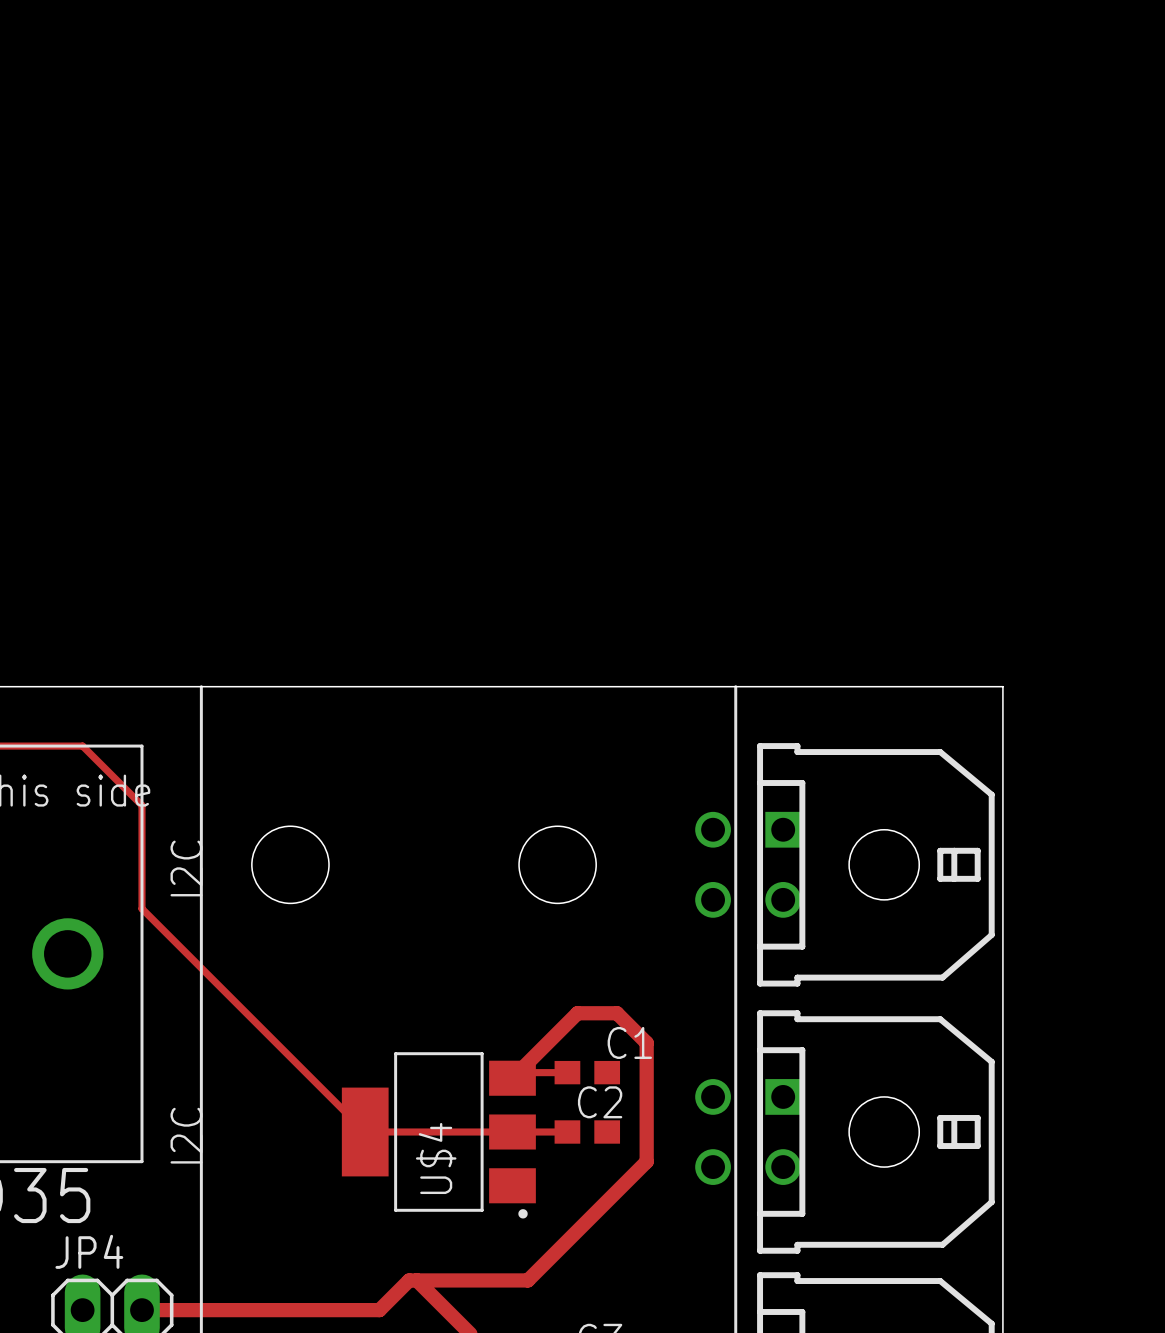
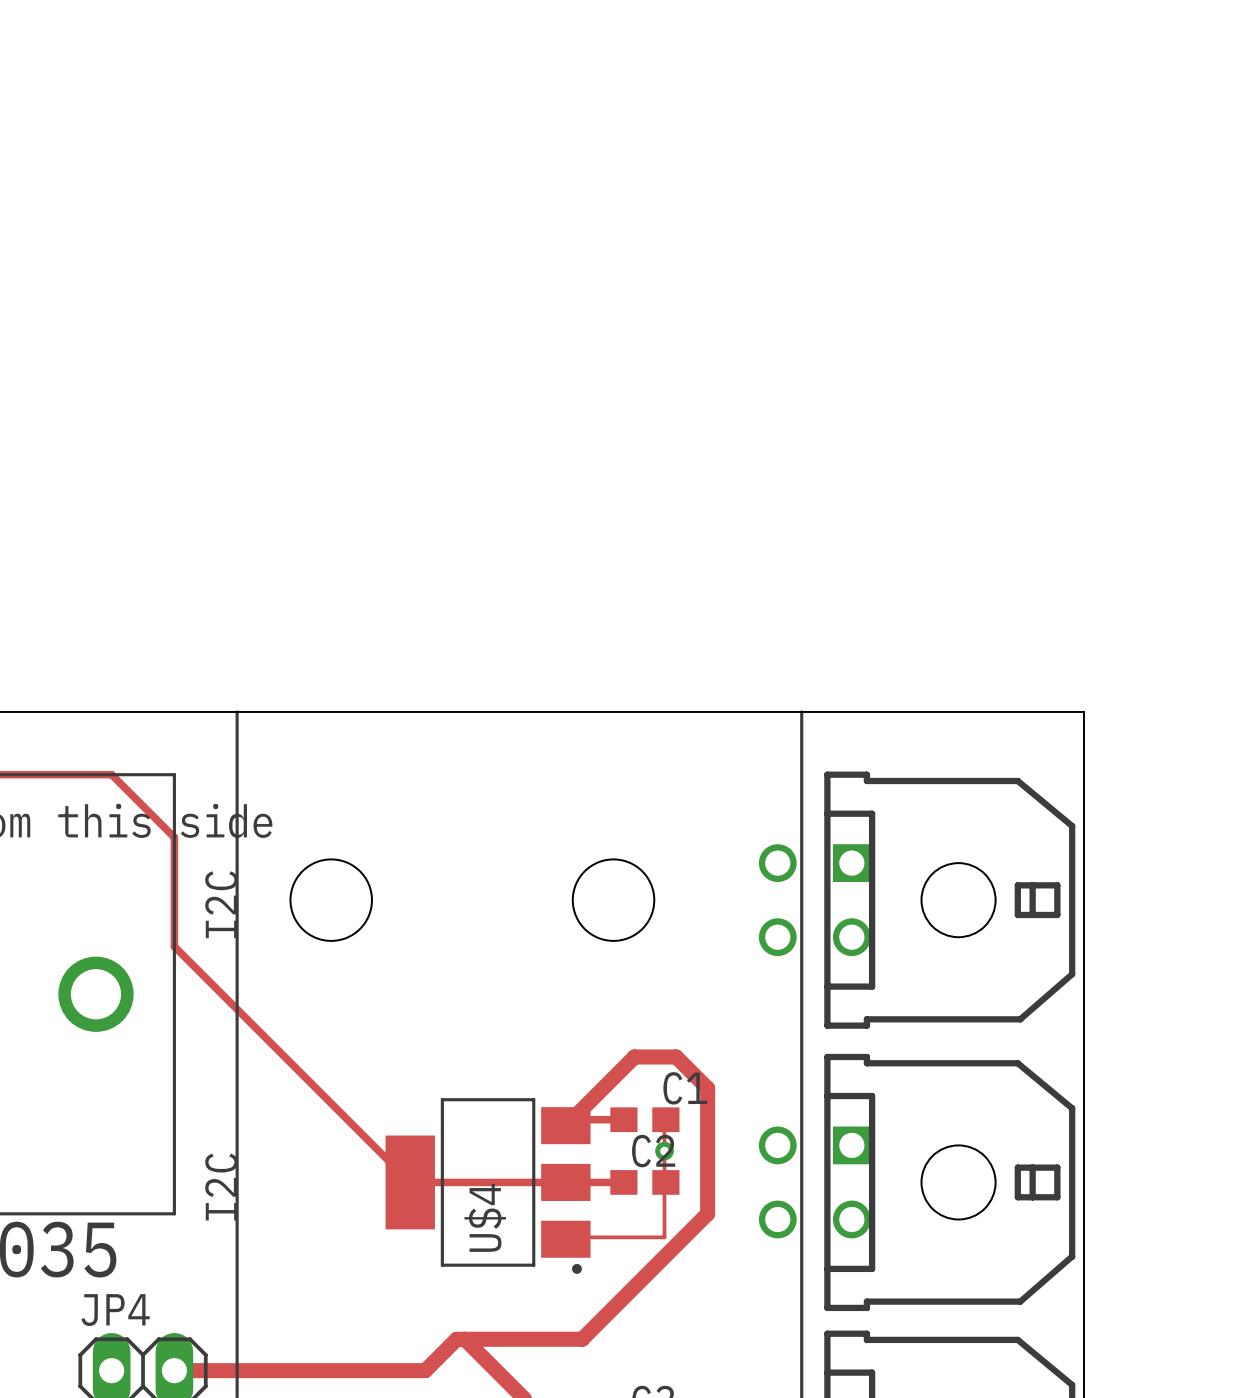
track: none -> (665, 1119) (664, 1237) (566, 1237) (565, 1239)
via: none -> (664, 1151)

